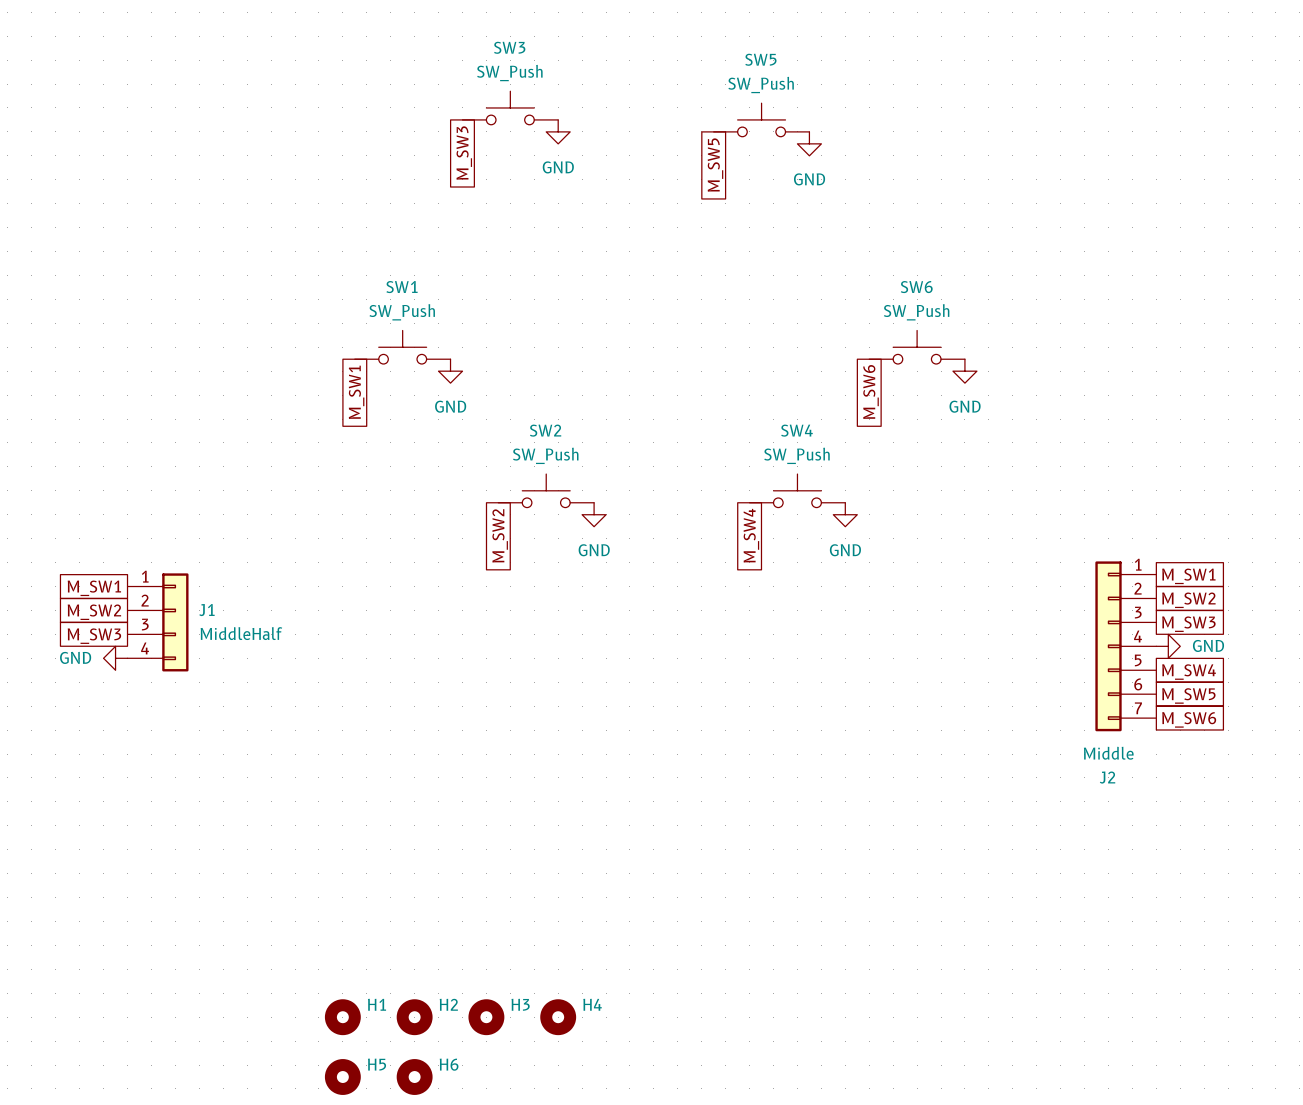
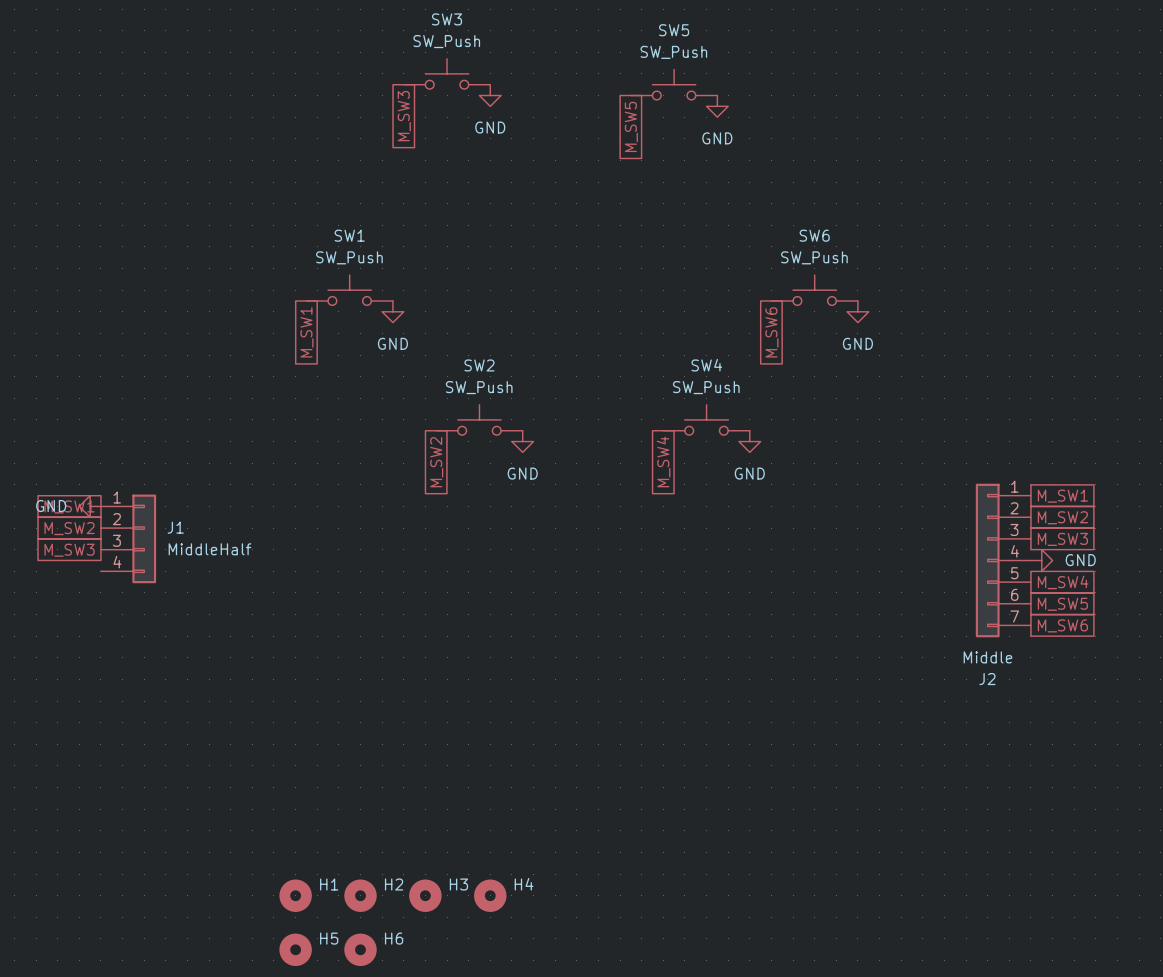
power symbol position: GND (115, 658) -> GND (90, 506)

